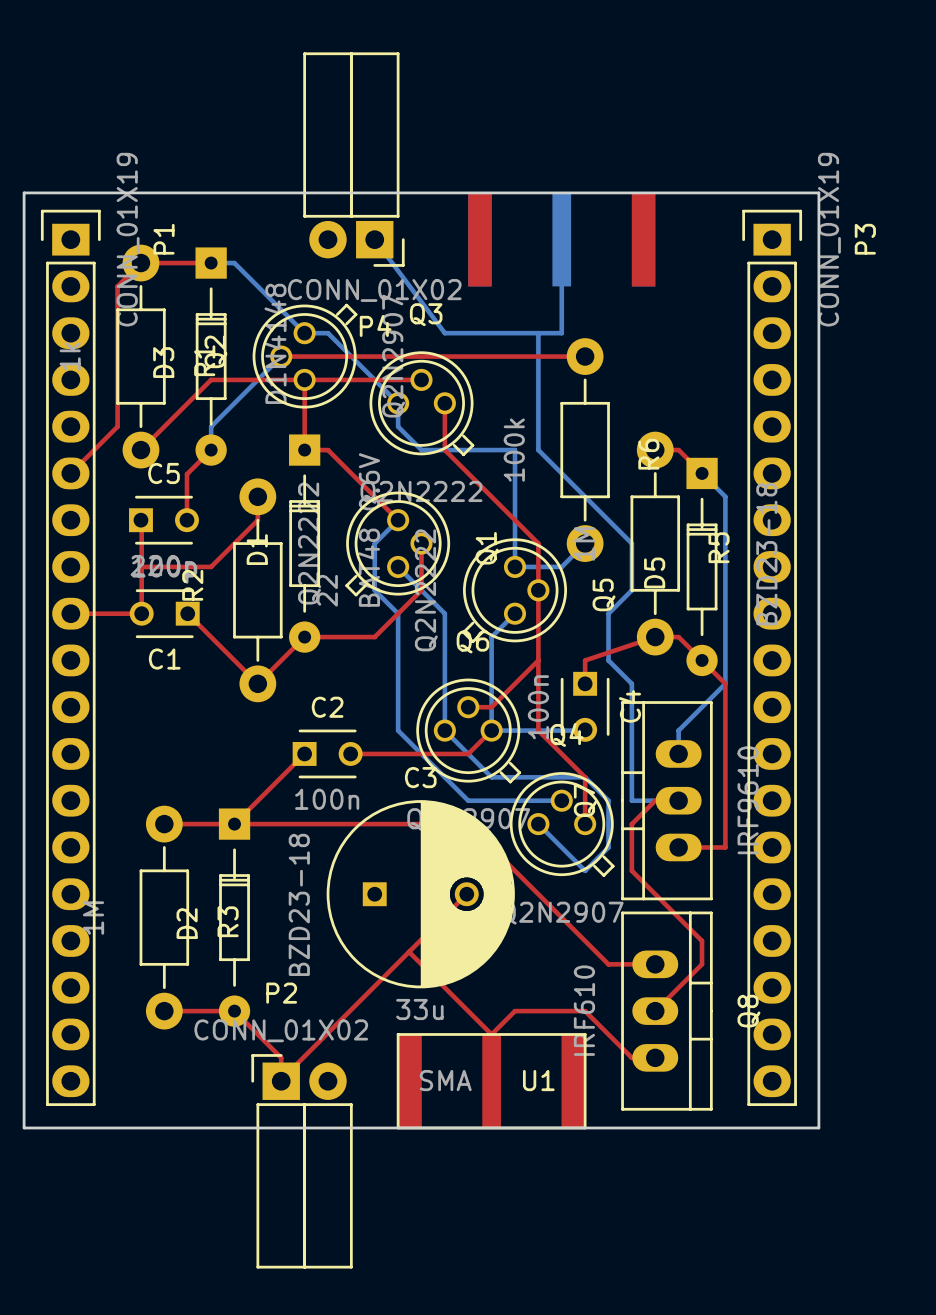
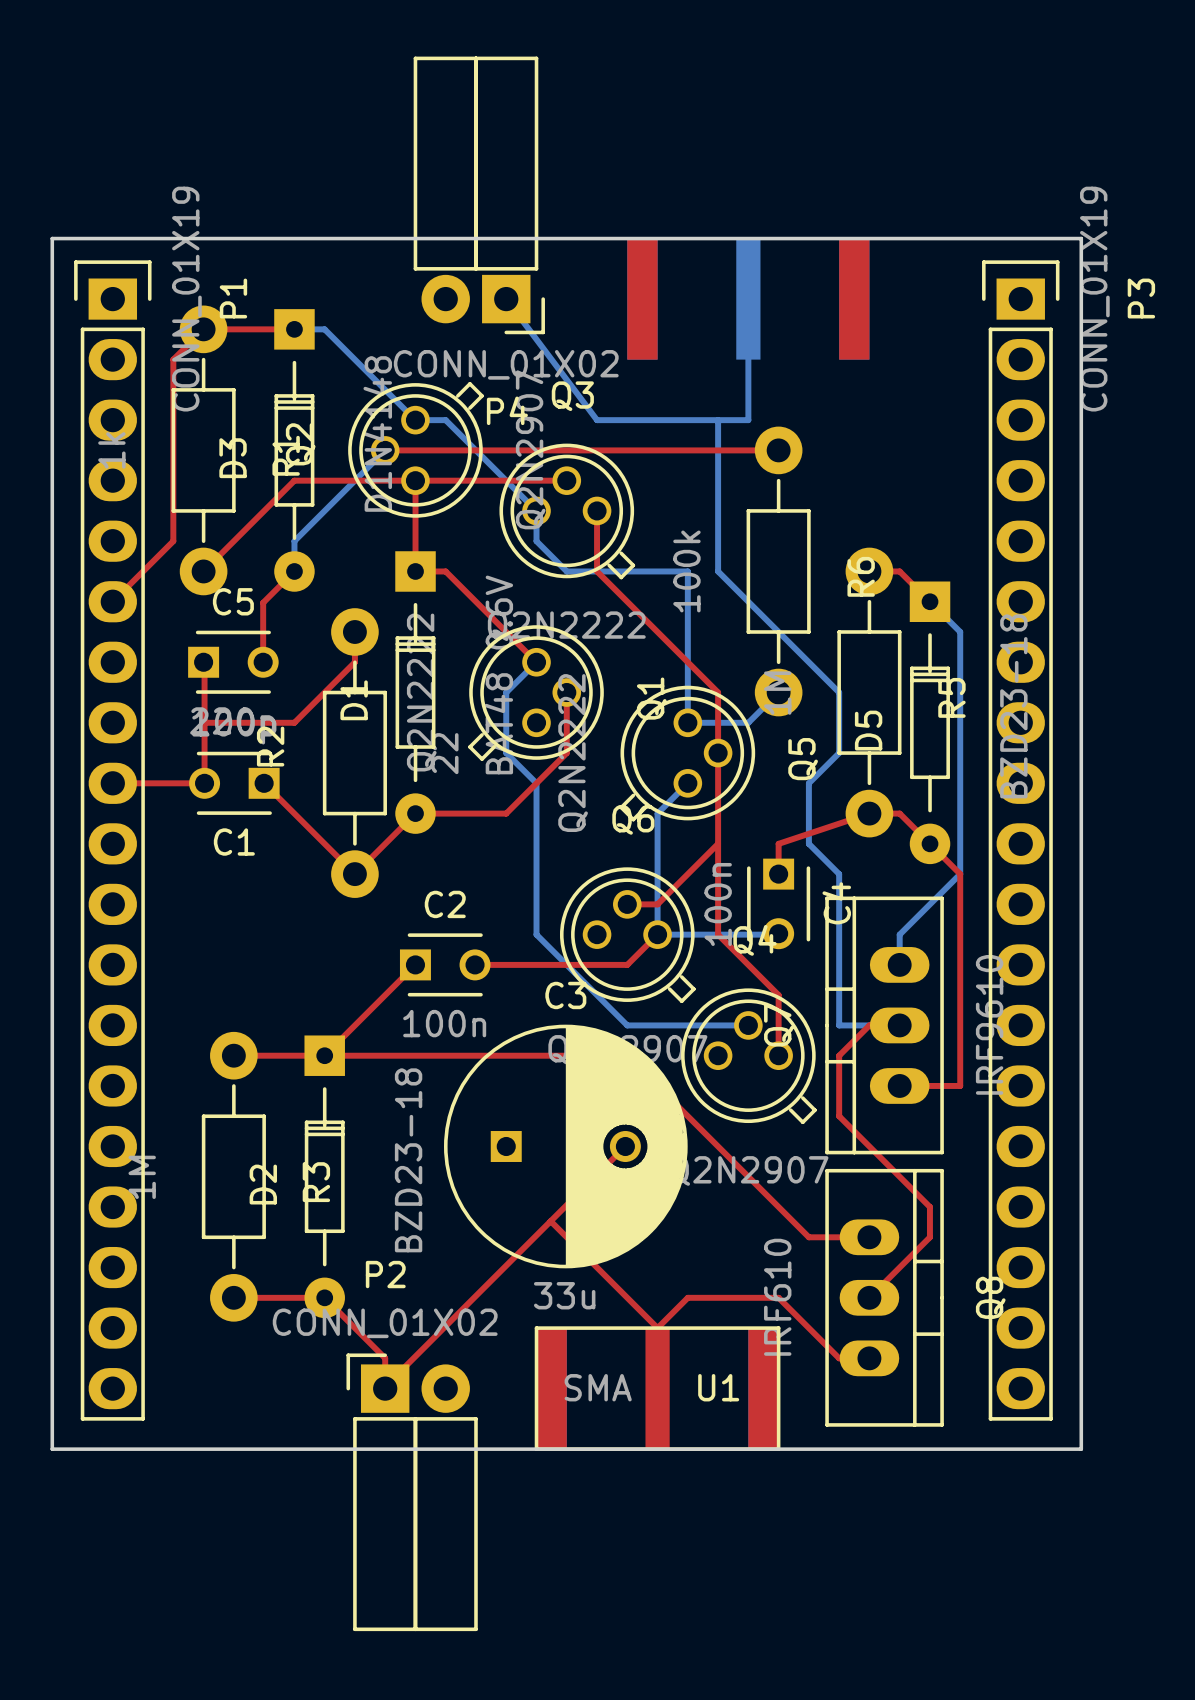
bottom track: (398, 566) (444, 613) (444, 730) (491, 777) (585, 777) (608, 800) (608, 847) (585, 870) (538, 824) -> none

